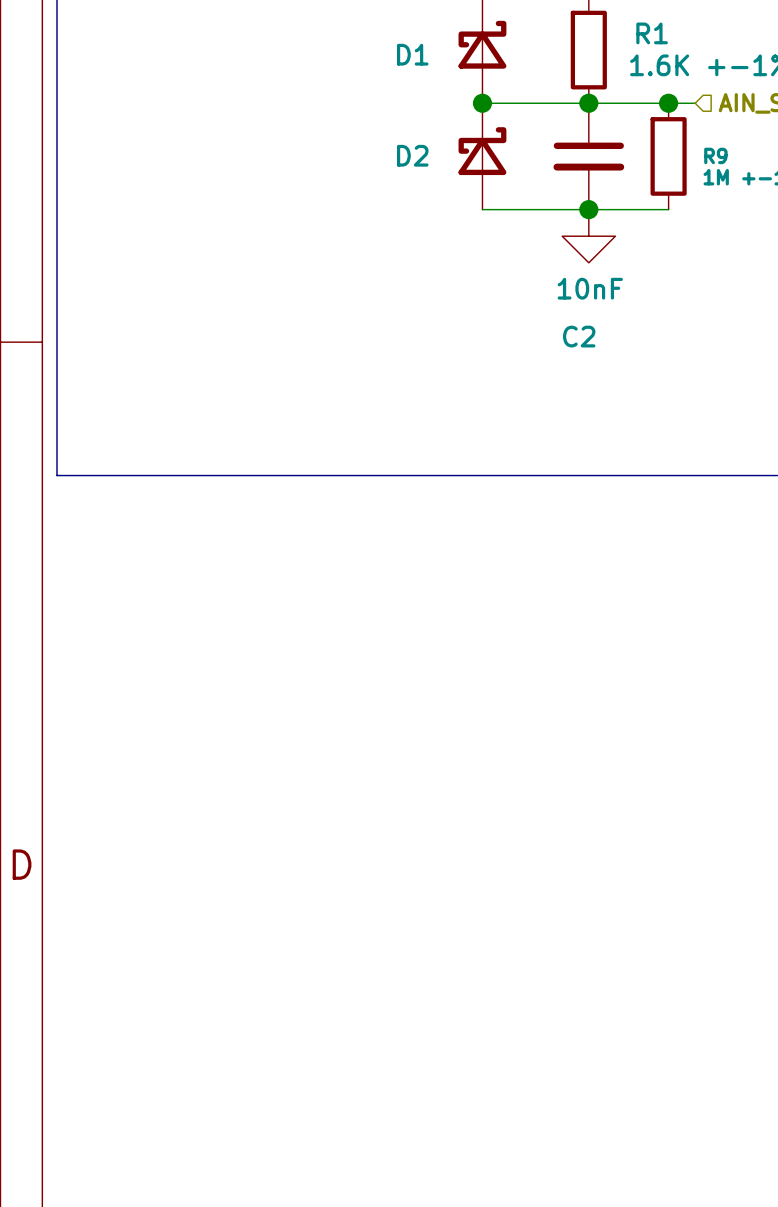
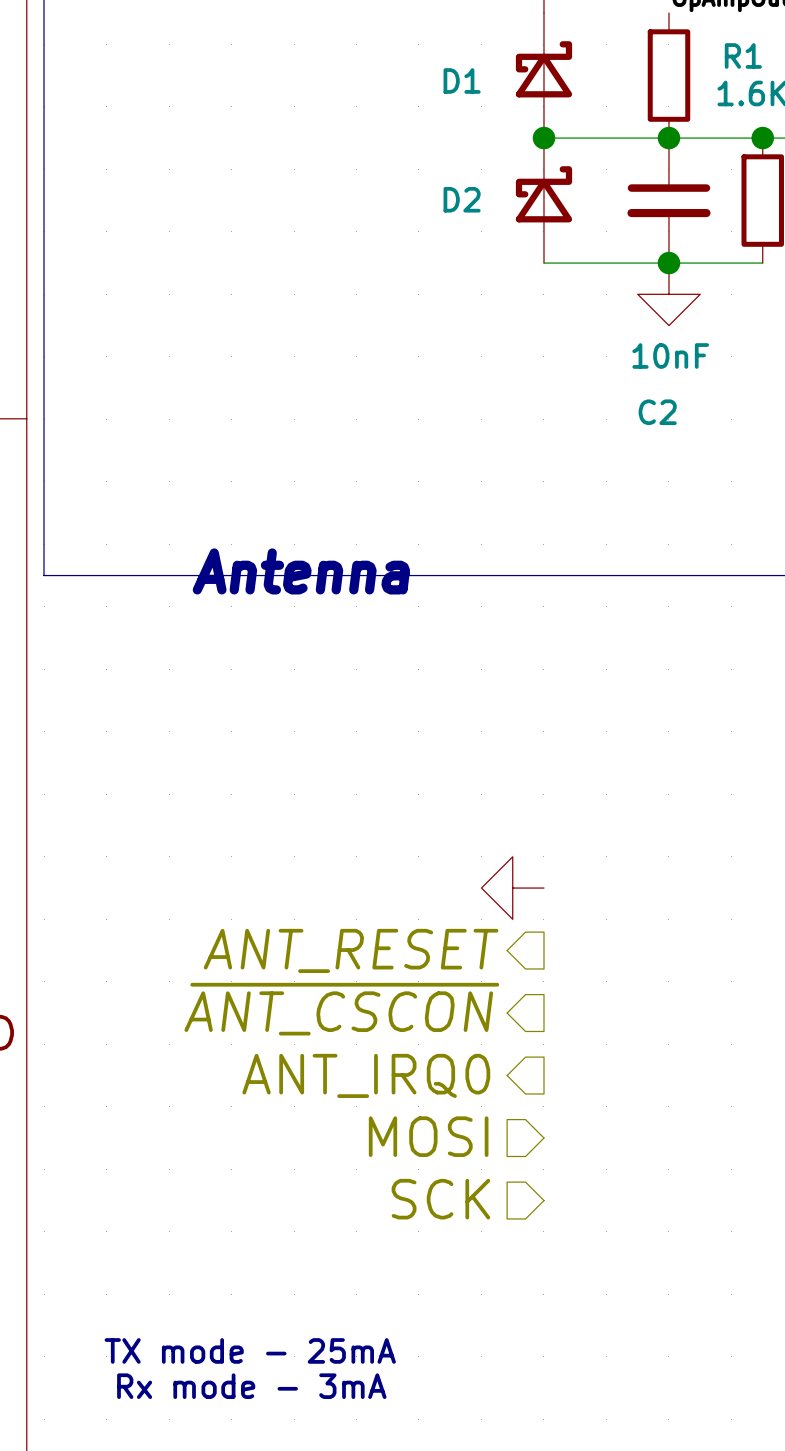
text: none -> Antenna (301, 571)
power symbol: none -> (512, 888)
hierarchical label: none -> ANT_RESET (351, 950)
hierarchical label: none -> ~{ANT_CSCON} (341, 1009)
hierarchical label: none -> ANT_IRQ0 (366, 1075)
hierarchical label: none -> MOSI (428, 1136)
hierarchical label: none -> SCK (440, 1199)
text: none -> TX mode - 25mA (250, 1350)
text: none -> Rx mode - 3mA (251, 1386)

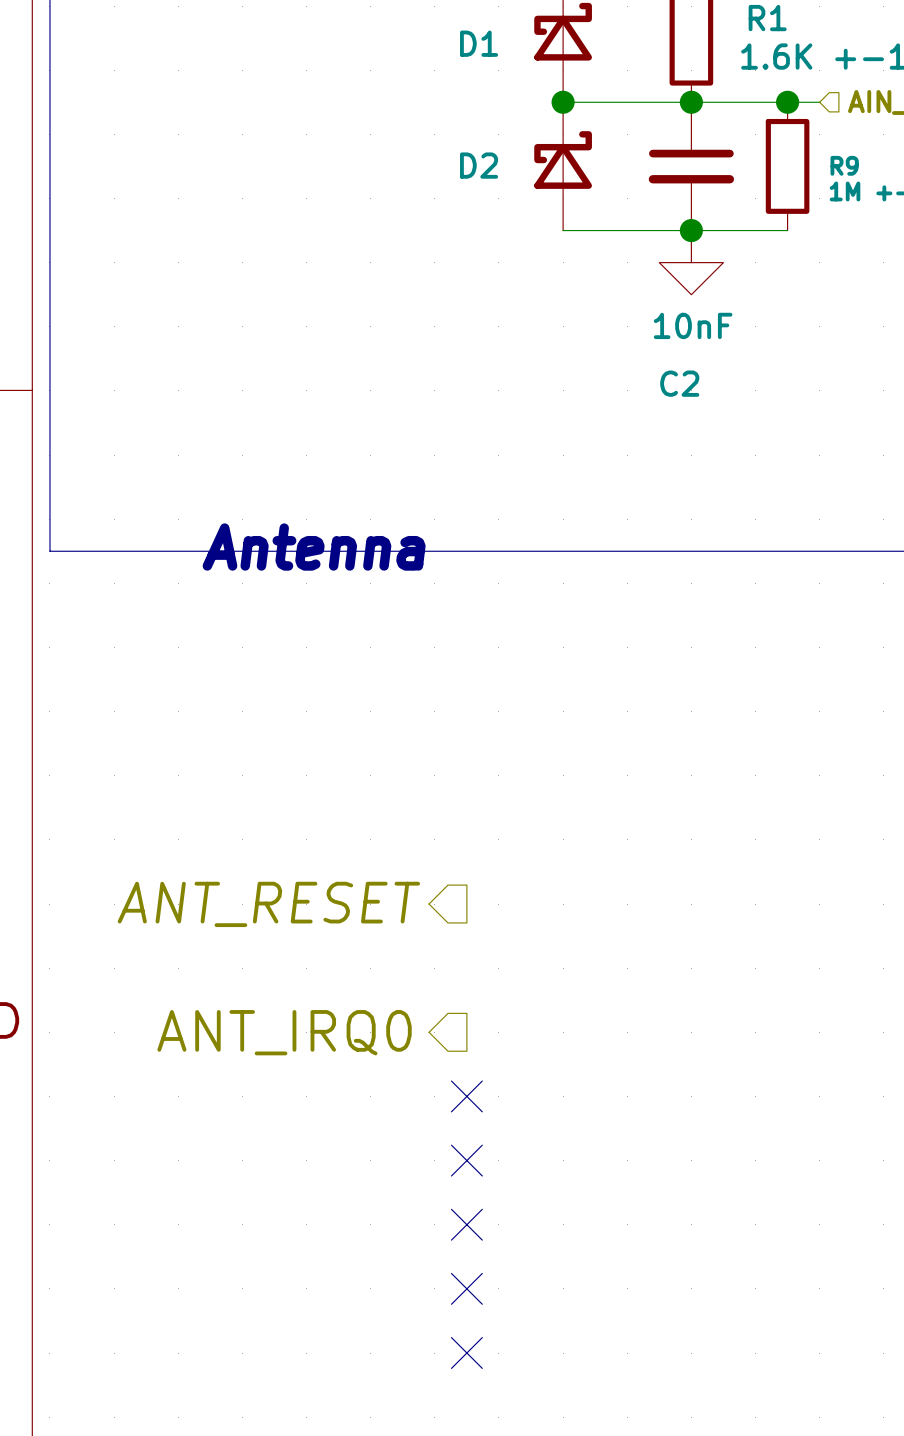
power symbol: (512, 888) -> none
hierarchical label position: ANT_RESET (351, 950) -> ANT_RESET (268, 904)
hierarchical label: ~{ANT_CSCON} (341, 1009) -> none
hierarchical label position: ANT_IRQ0 (366, 1075) -> ANT_IRQ0 (284, 1032)
no-connect mark: none -> (466, 1096)
hierarchical label: MOSI (428, 1136) -> none
no-connect mark: none -> (466, 1160)
hierarchical label: SCK (440, 1199) -> none
no-connect mark: none -> (466, 1224)
no-connect mark: none -> (466, 1288)
text: TX mode - 25mA (250, 1350) -> none
no-connect mark: none -> (466, 1353)
text: Rx mode - 3mA (251, 1386) -> none

